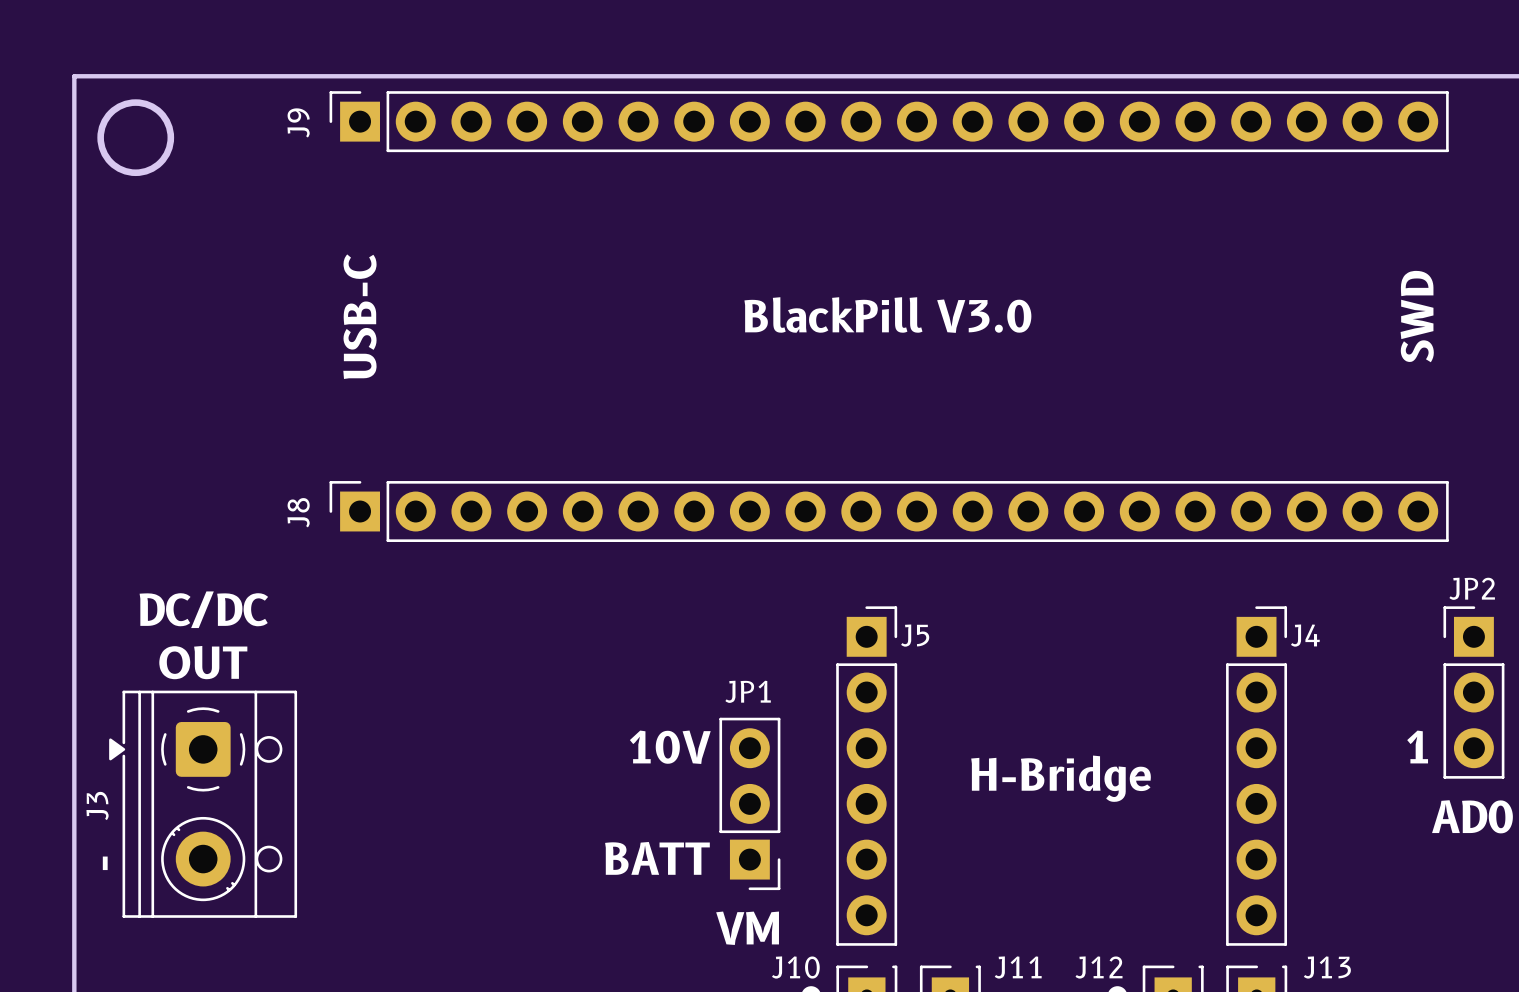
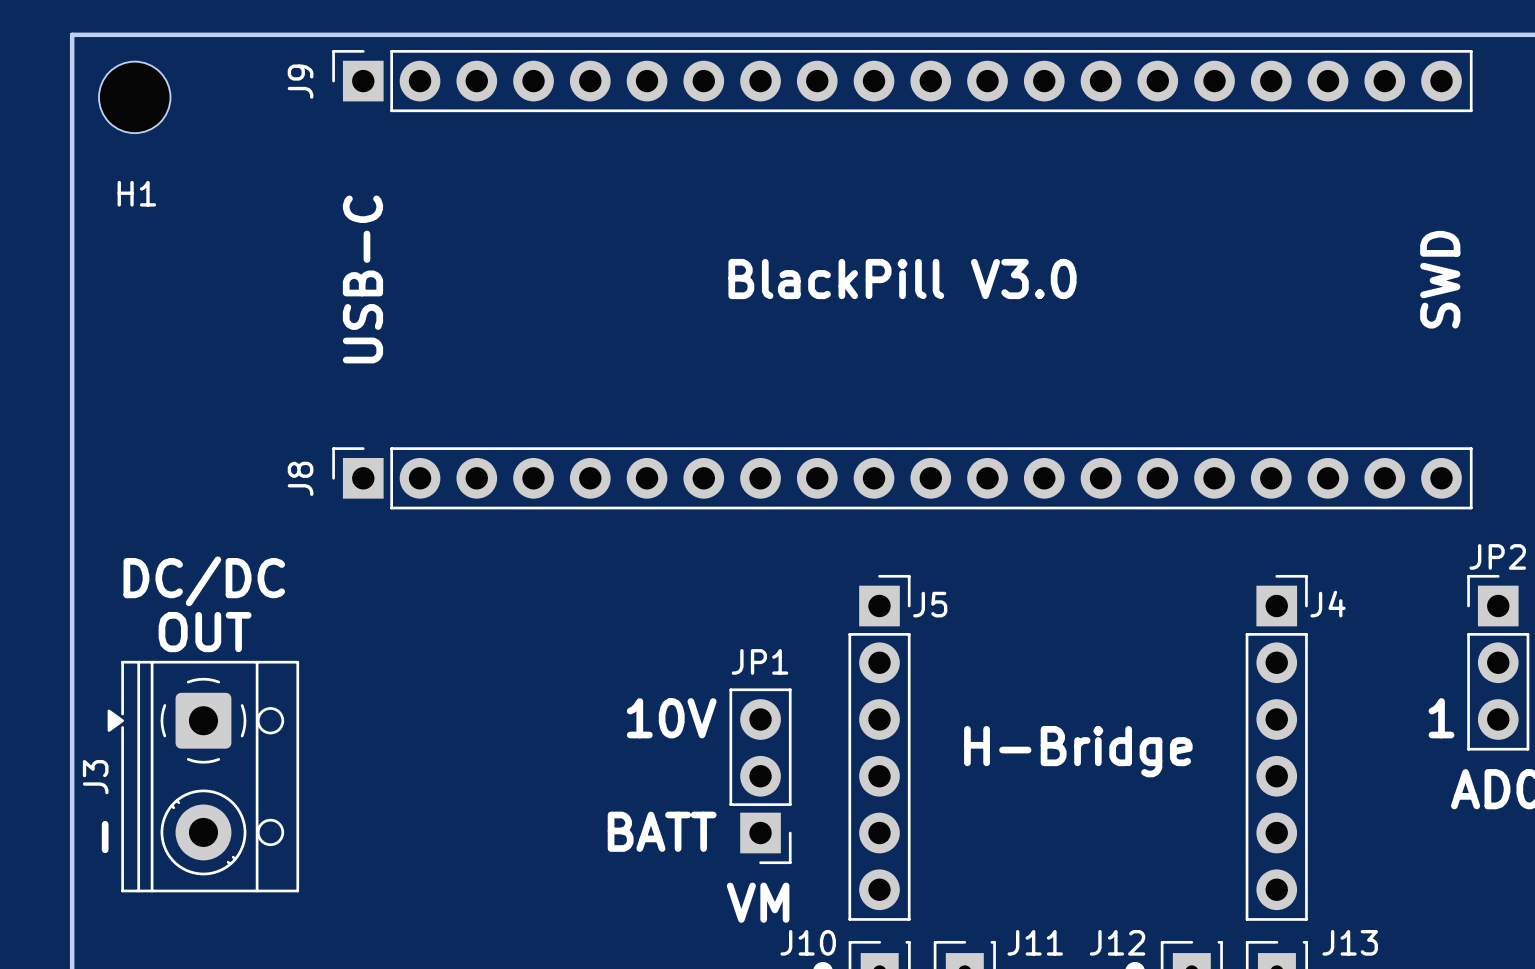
round board edge: [97, 99, 175, 177] -> none
H1: none -> (134, 97)

